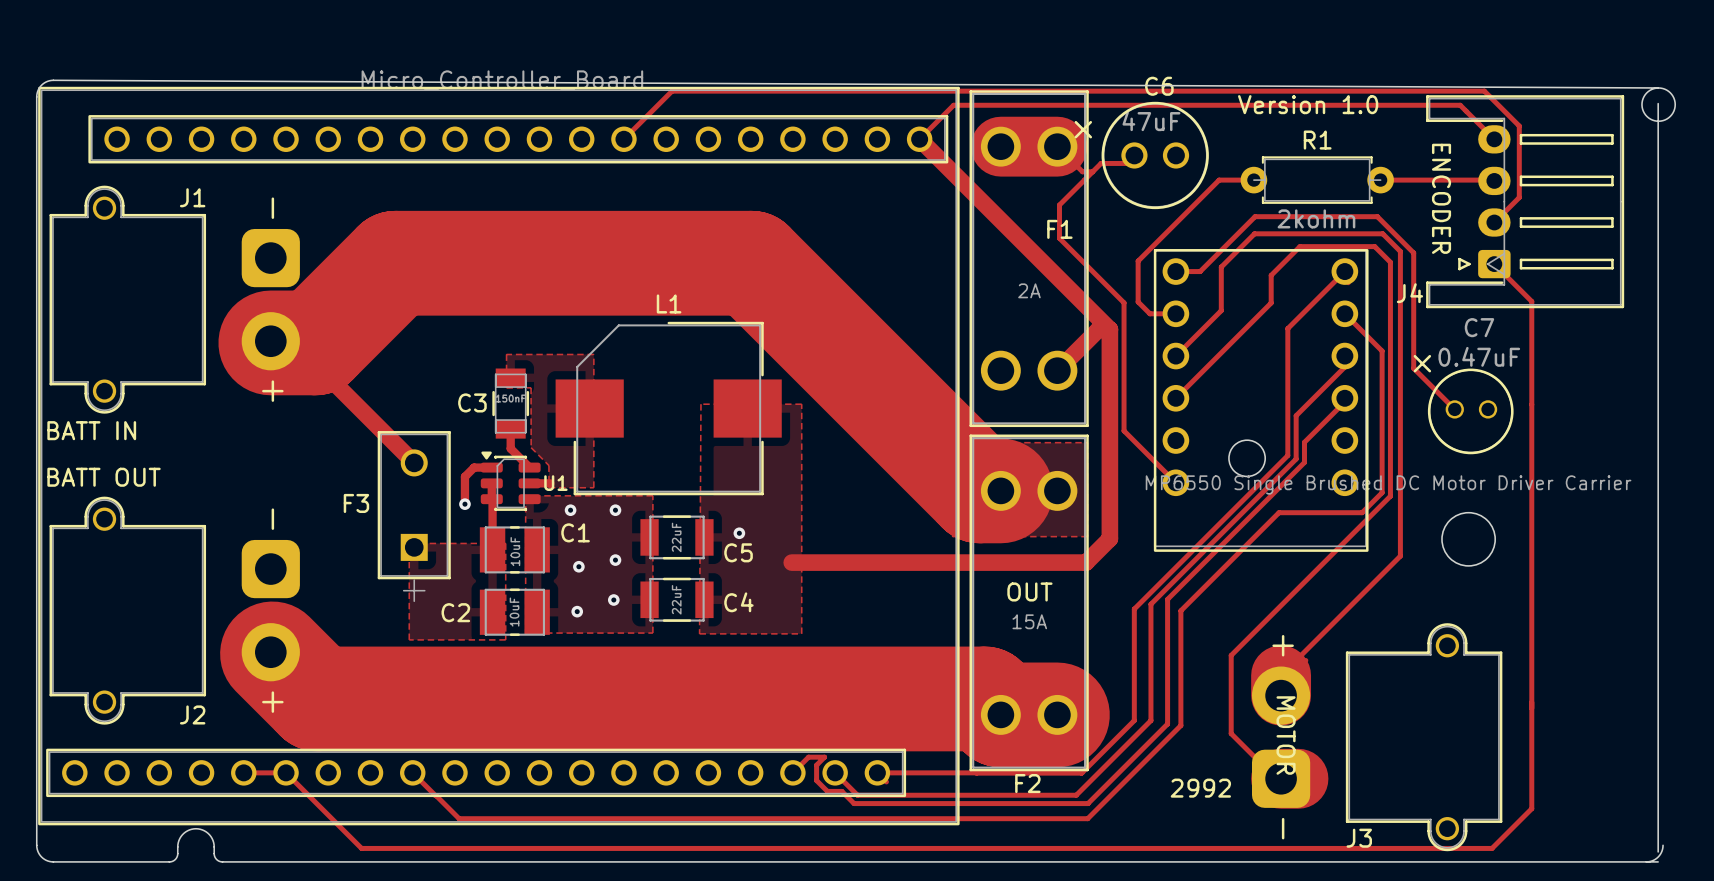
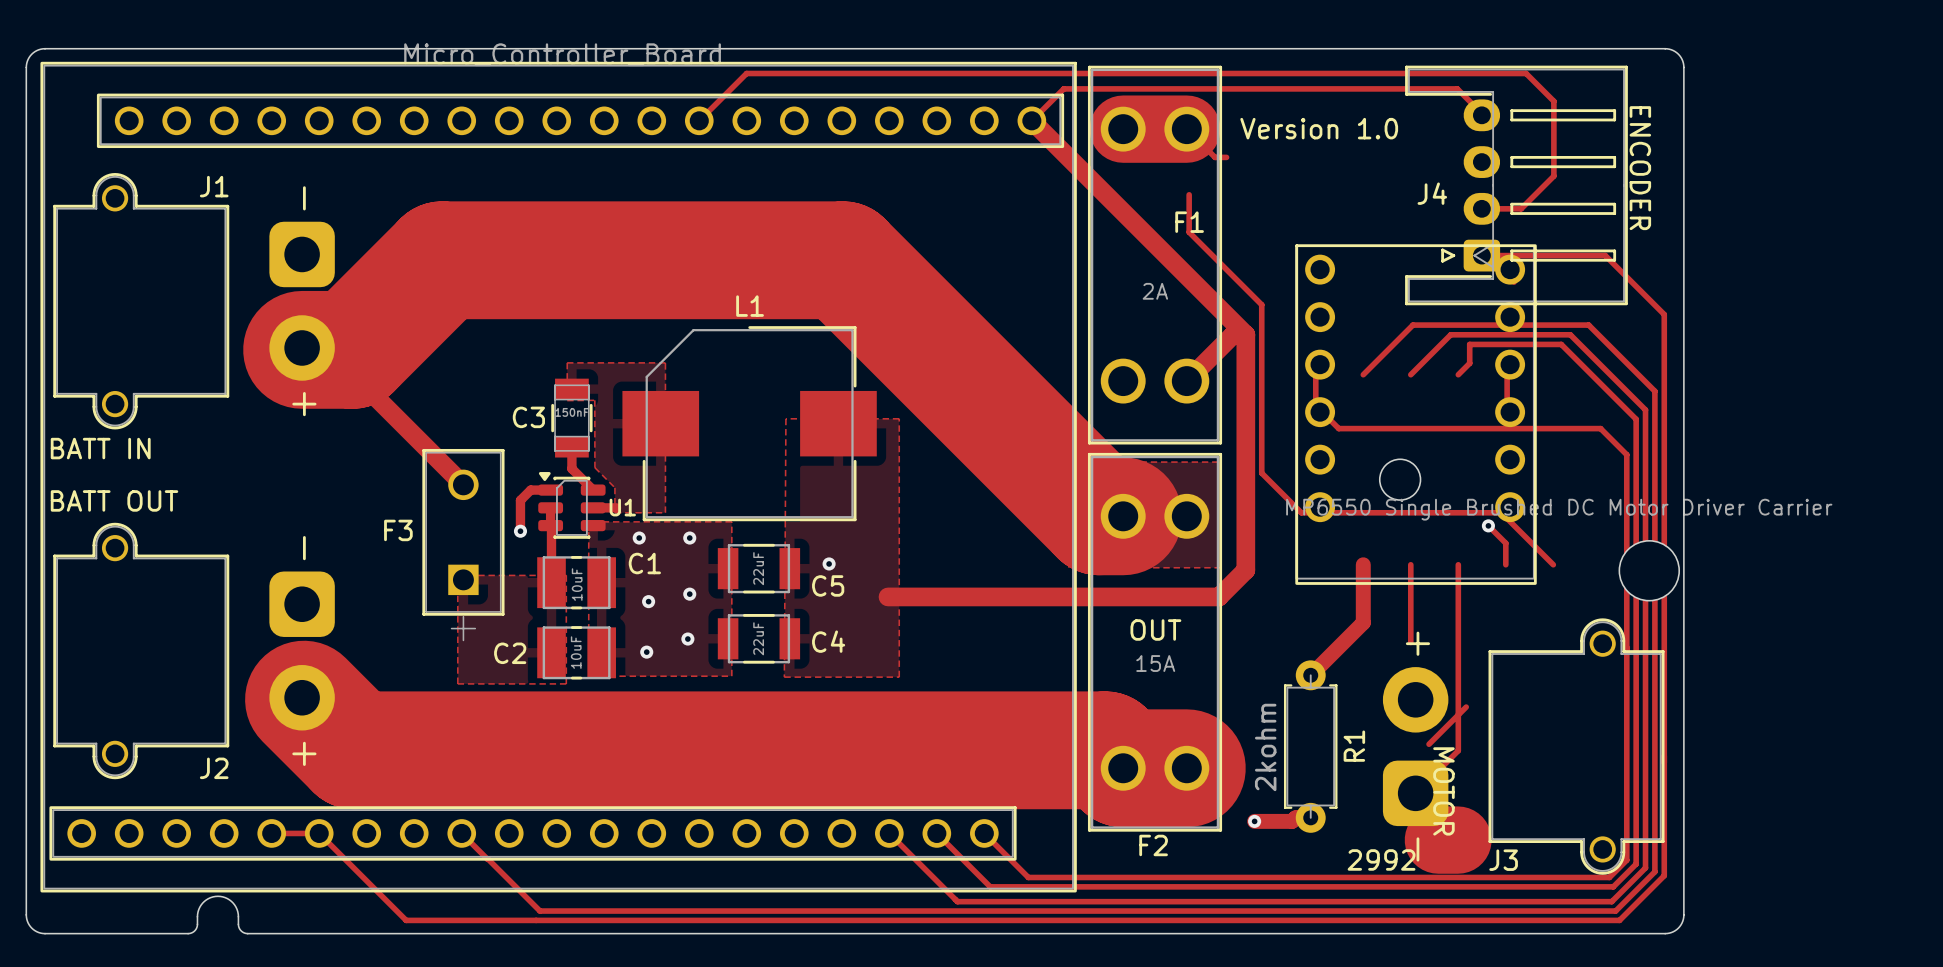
board edge: (1658, 87) (1670, 92) (1675, 104) (1670, 116) (1658, 121) (1647, 116) (1641, 104) (1646, 93) (1658, 87) (53, 80) (46, 81) (39, 88) (36, 96) (36, 845) (41, 857) (53, 861) -> (1665, 933) (1678, 928) (1683, 914) (1683, 67) (1681, 57) (1673, 50) (1665, 48) (45, 48) (31, 54) (26, 67) (26, 914) (28, 923) (35, 930) (42, 933) (57, 933)
track: (666, 97) (672, 91) (1484, 91) (1519, 126) (1519, 197) (1494, 222) -> (746, 73) (1526, 73) (1553, 101) (1553, 176) (1521, 208) (1481, 208) (1488, 204)
board edge: (1658, 103) (1658, 851) -> none
text position: Version 1.0 (1308, 104) -> Version 1.0 (1319, 128)
track: (948, 110) (953, 105) (1460, 105) (1494, 139) -> (1063, 88) (1457, 88) (1481, 115)
track: (1134, 155) (1126, 163) (1101, 163) (1059, 205) -> none
C6: 47uF (1141, 155) -> none
track: (1250, 180) (1219, 180) (1138, 261) (1138, 301) (1149, 313) (1175, 313) -> none
R1 rotation: 0° (1317, 180) -> 90° clockwise (1310, 746)
R1 position: (1317, 180) -> (1310, 746)
track: (1380, 180) (1494, 180) -> none
text position: ENCODER (1441, 198) -> ENCODER (1640, 168)
J4 position: (1525, 201) -> (1516, 185)
track: (1494, 264) (1531, 301) (1531, 808) (1492, 848) (361, 848) -> (1481, 255) (1605, 255) (1664, 314) (1664, 875) (1619, 920) (406, 920) (404, 918)
track: (1175, 271) (1200, 271) (1255, 216) (1377, 216) (1413, 252) (1413, 368) (1454, 409) -> none
track: (1344, 271) (1287, 328) (1287, 455) (1134, 609) (1134, 720) (1082, 772) -> none
J4 name position: J4 (1409, 293) -> J4 (1432, 193)
track: (1344, 313) (1382, 351) (1382, 492) (1362, 512) (1279, 512) (1180, 610) (1180, 725) (1087, 818) (459, 818) -> (1363, 374) (1412, 325) (1588, 325) (1654, 391) (1654, 871) (1615, 911) (539, 911) (513, 884)
track: (1182, 356) (1175, 356) (1221, 310) (1221, 267) (1254, 233) (1382, 233) (1400, 251) (1400, 556) (1281, 675) (1281, 695) -> none
track: (1344, 356) (1344, 367) (1296, 415) (1296, 459) (1150, 604) (1150, 720) (1076, 795) (857, 795) -> (1458, 374) (1469, 363) (1469, 344) (1561, 344) (1636, 419) (1636, 864) (1613, 886) (990, 886) (961, 858)
track: none -> (1315, 374) (1315, 405) (1338, 428) (1600, 428) (1626, 454) (1626, 860) (1609, 877) (1028, 877) (994, 843)
track: none -> (1505, 374) (1507, 409)
track: (1175, 398) (1271, 302) (1271, 275) (1299, 246) (1374, 246) (1390, 262) (1390, 496) (1231, 655) (1231, 733) (1289, 791) -> none
C7: 0.47uF (1463, 404) -> none
track: (1347, 405) (1341, 405) (1304, 442) (1304, 462) (1167, 599) (1167, 724) (1088, 803) (854, 803) (841, 791) (827, 791) (816, 780) (816, 765) (824, 757) (808, 757) (792, 772) -> (1410, 374) (1450, 334) (1570, 334) (1645, 409) (1645, 867) (1611, 901) (957, 901) (889, 833)
track: (1124, 430) (1175, 482) -> (1261, 448) (1261, 473) (1301, 512) (1501, 512) (1553, 564)
track: none -> (1488, 525) (1505, 543) (1505, 564)
via: none -> (1488, 525)
track: none -> (1363, 564) (1363, 622) (1310, 675)
track: none -> (1410, 564) (1410, 642)
track: none -> (1458, 564) (1458, 750) (1398, 810)
J3 position: (1377, 737) -> (1523, 746)
track: none -> (1310, 817) (1295, 817) (1292, 821) (1254, 821)
via: none -> (1254, 821)
track: (877, 772) (1081, 772) -> none
text position: 2992 (1200, 788) -> 2992 (1381, 859)
board edge: (1663, 845) (1658, 857) (1646, 861) -> none
board edge: (1482, 861) (1658, 861) -> none

